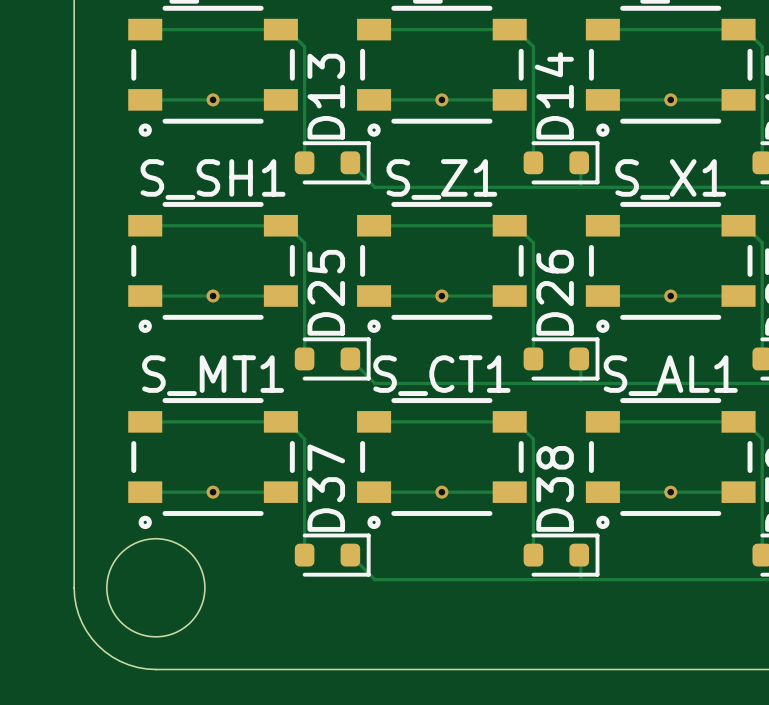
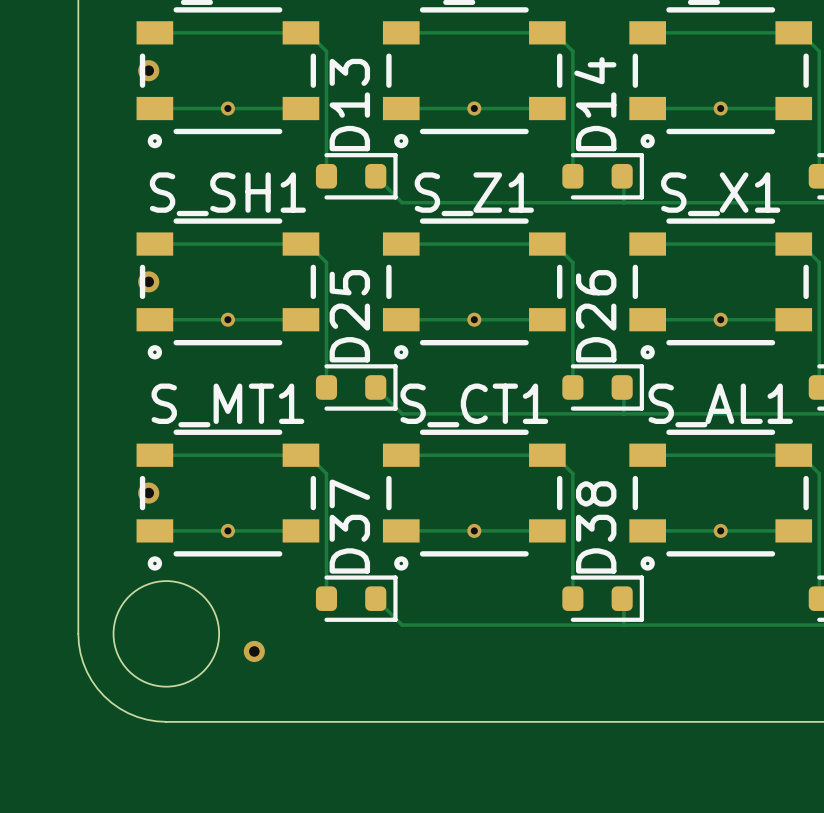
via: none -> (148, 70)
via: none -> (148, 281)
via: none -> (148, 493)
via: none -> (254, 651)

